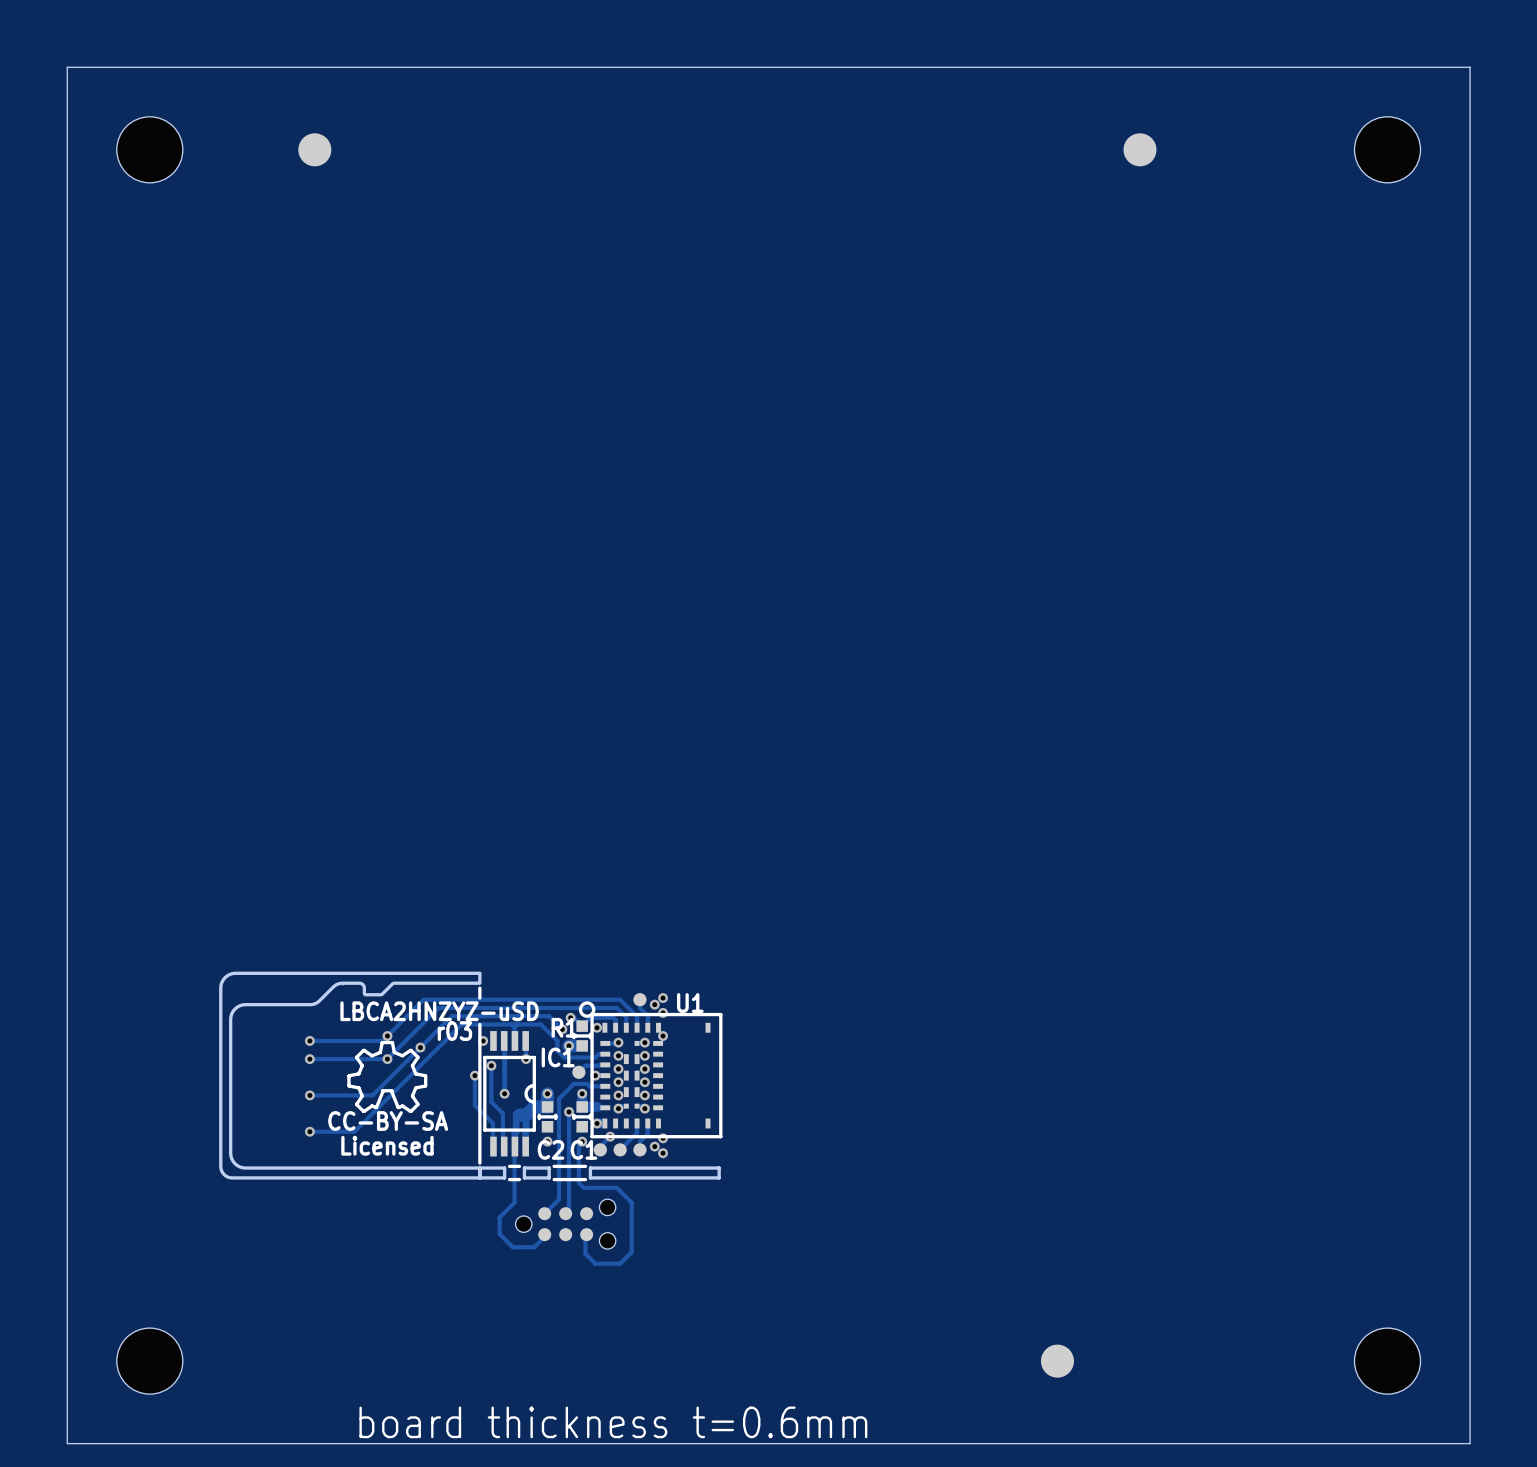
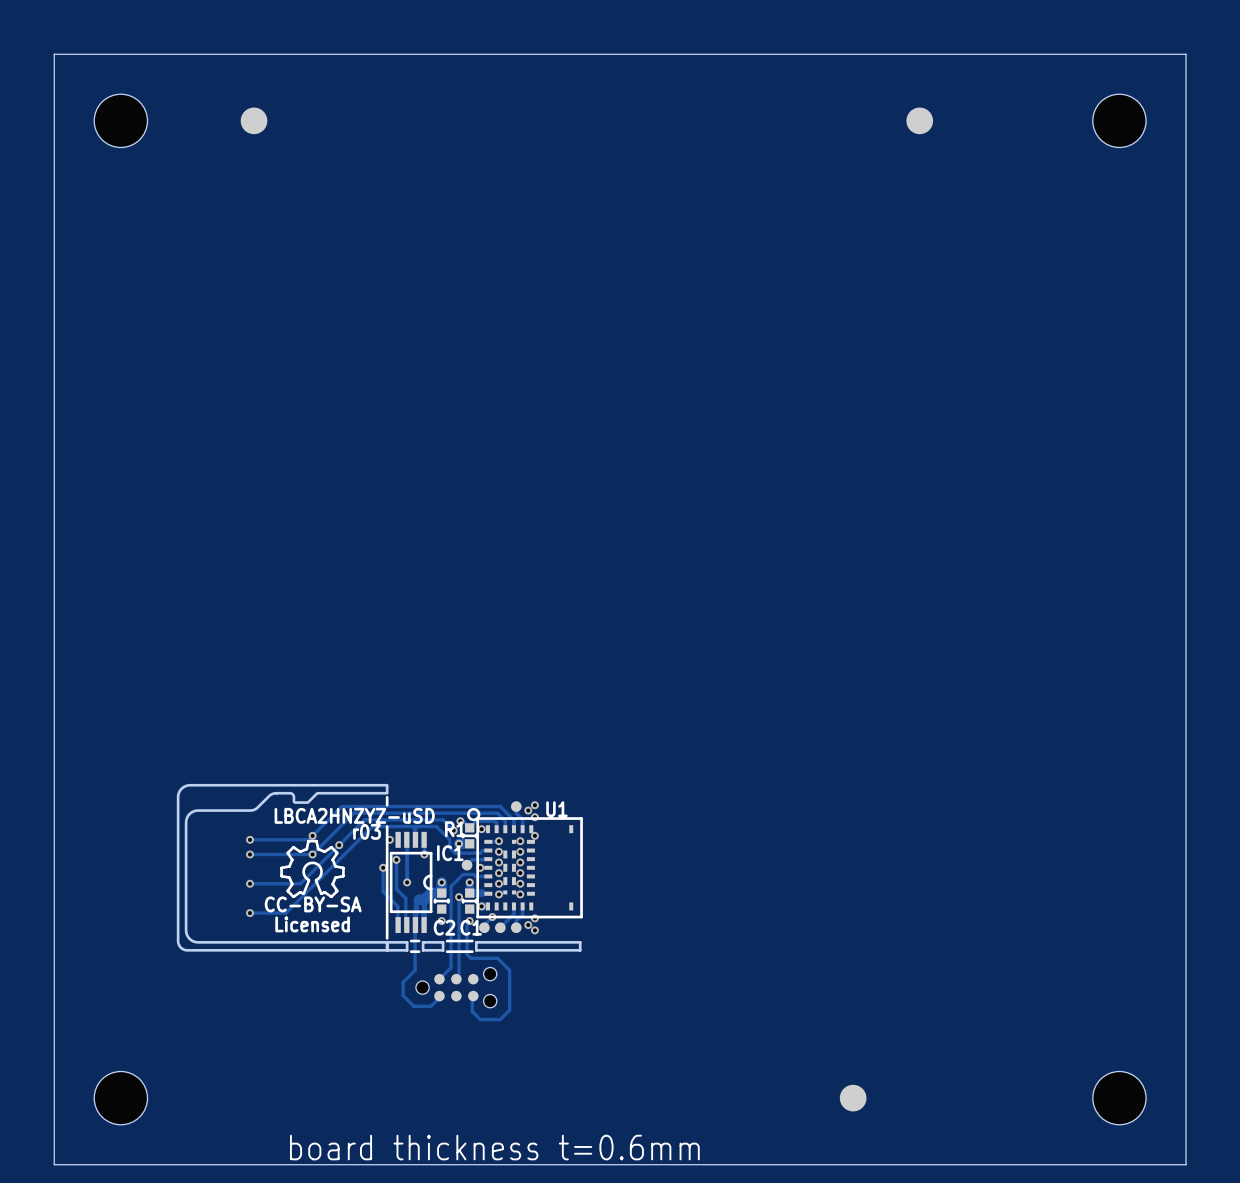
drawing shape: [347, 1040, 428, 1114] -> [280, 839, 345, 898]

